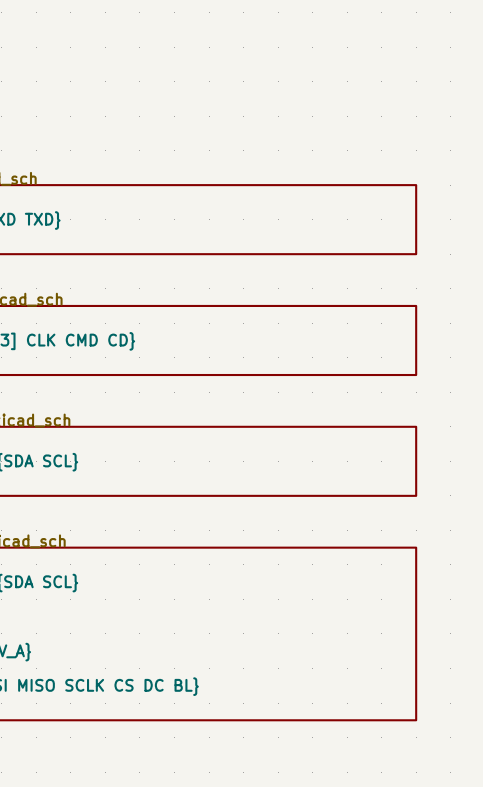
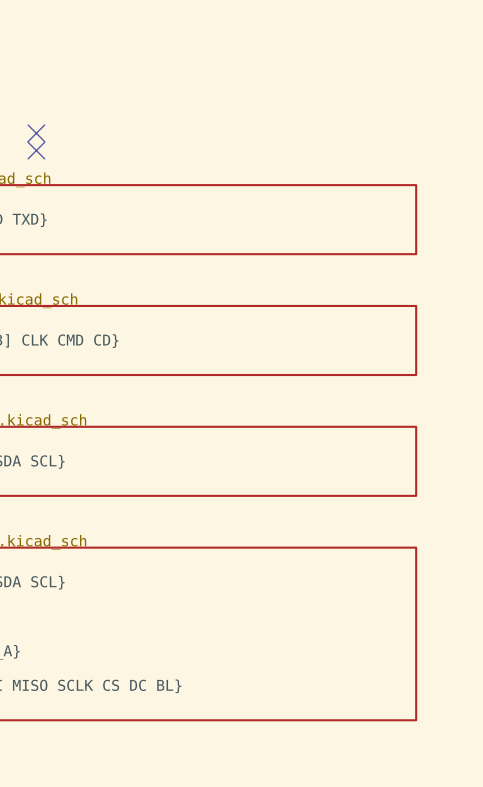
no-connect mark: none -> (36, 133)
no-connect mark: none -> (36, 150)

